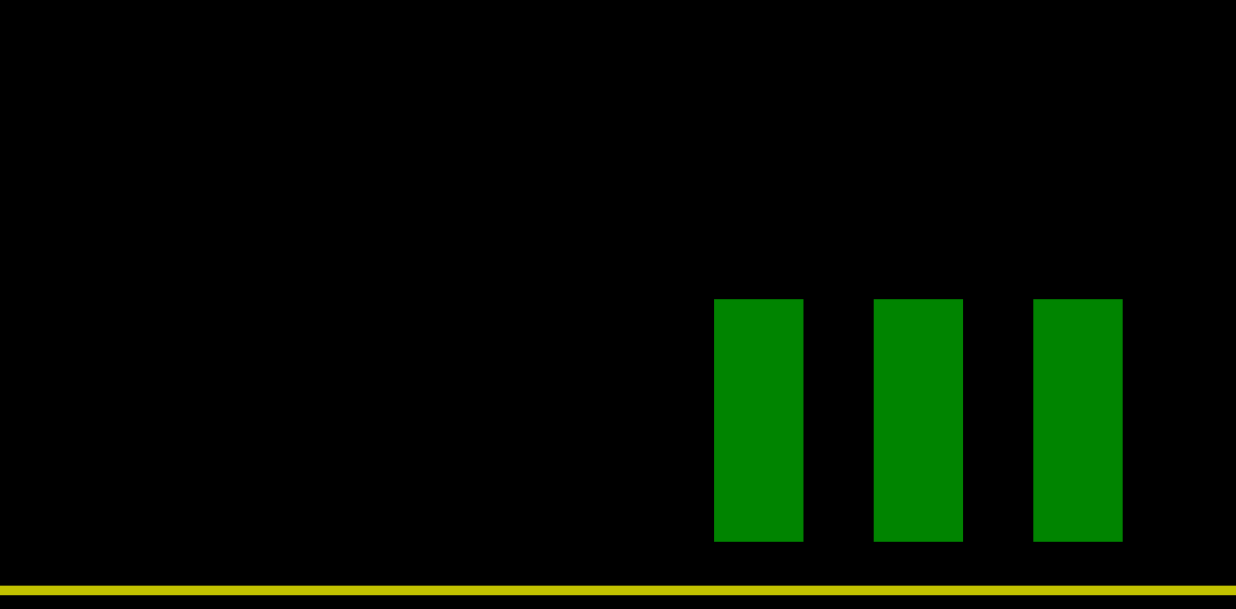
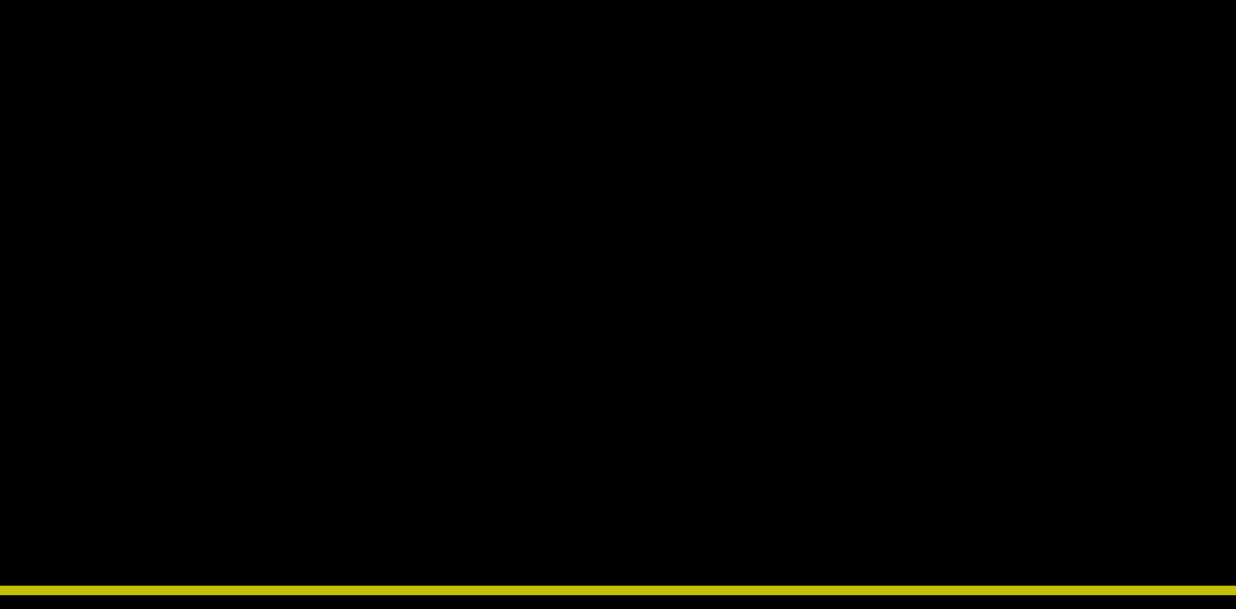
part: (918, 420) -> none

